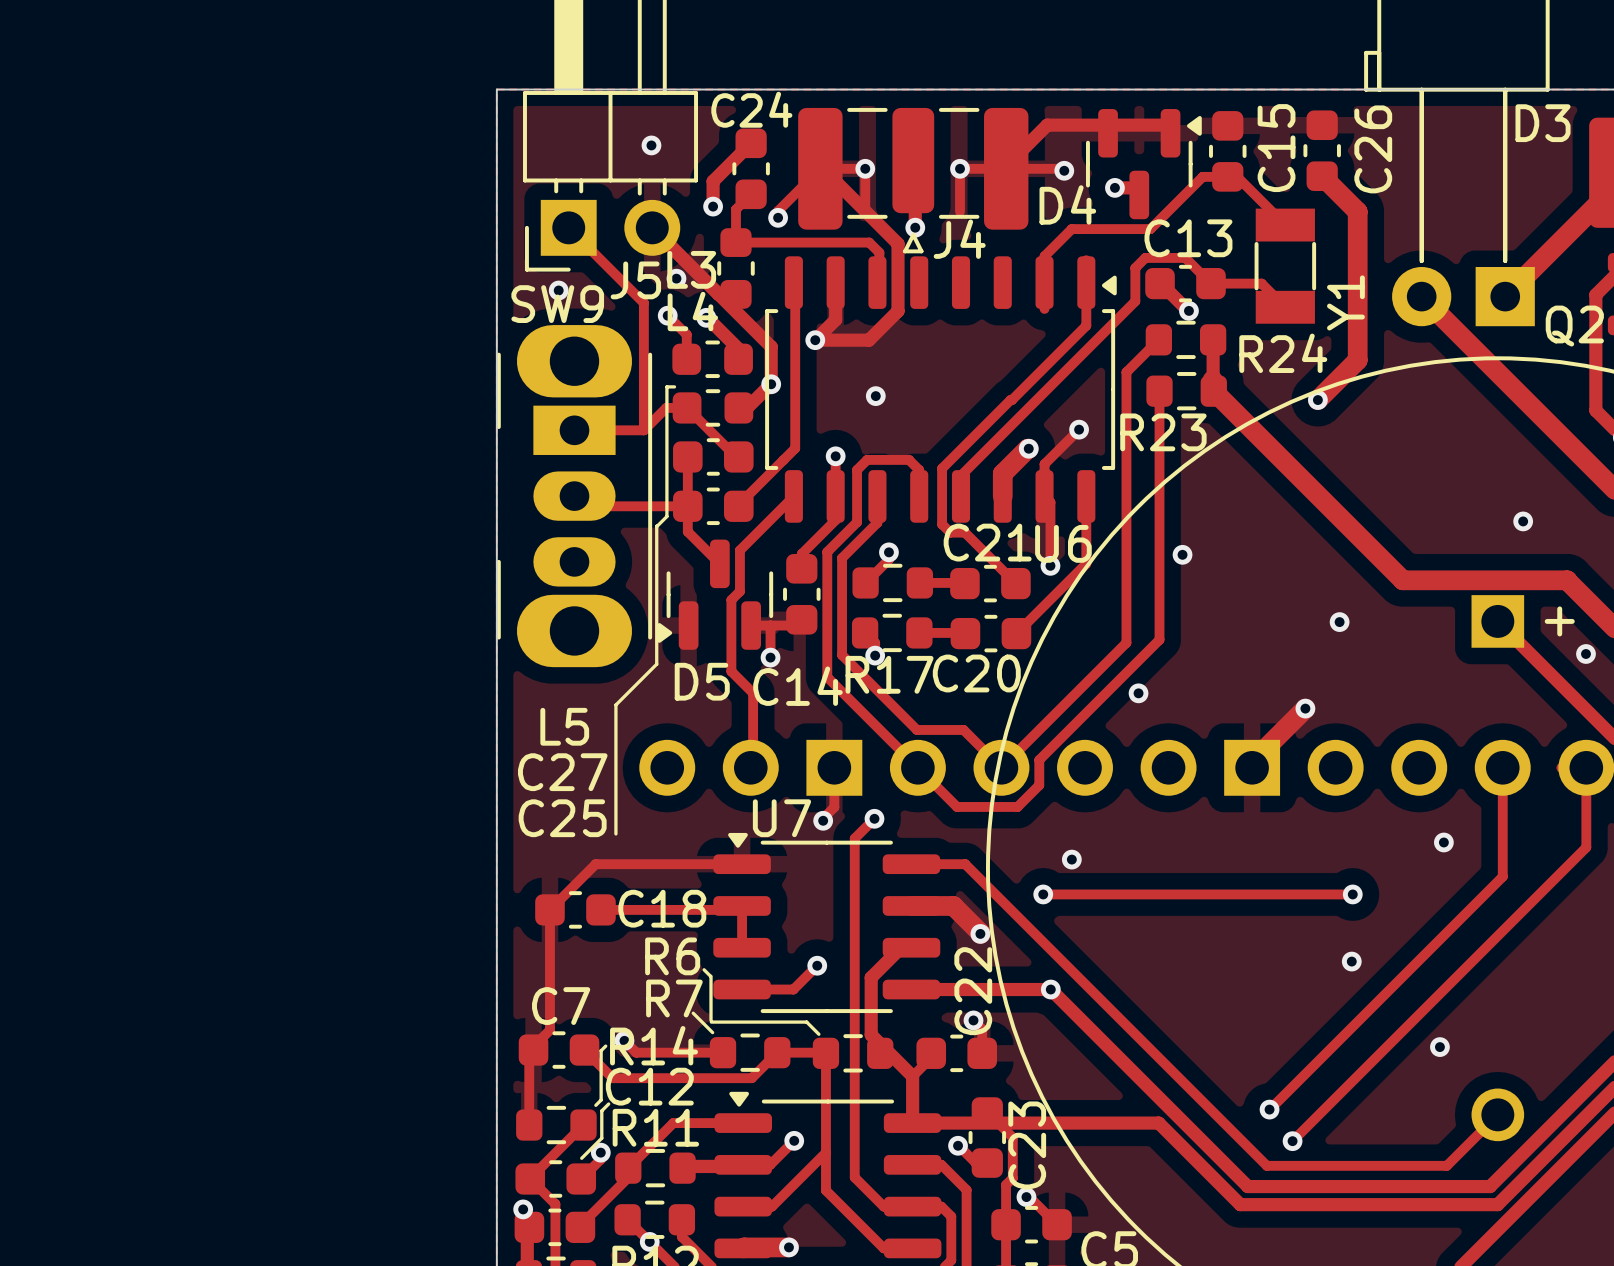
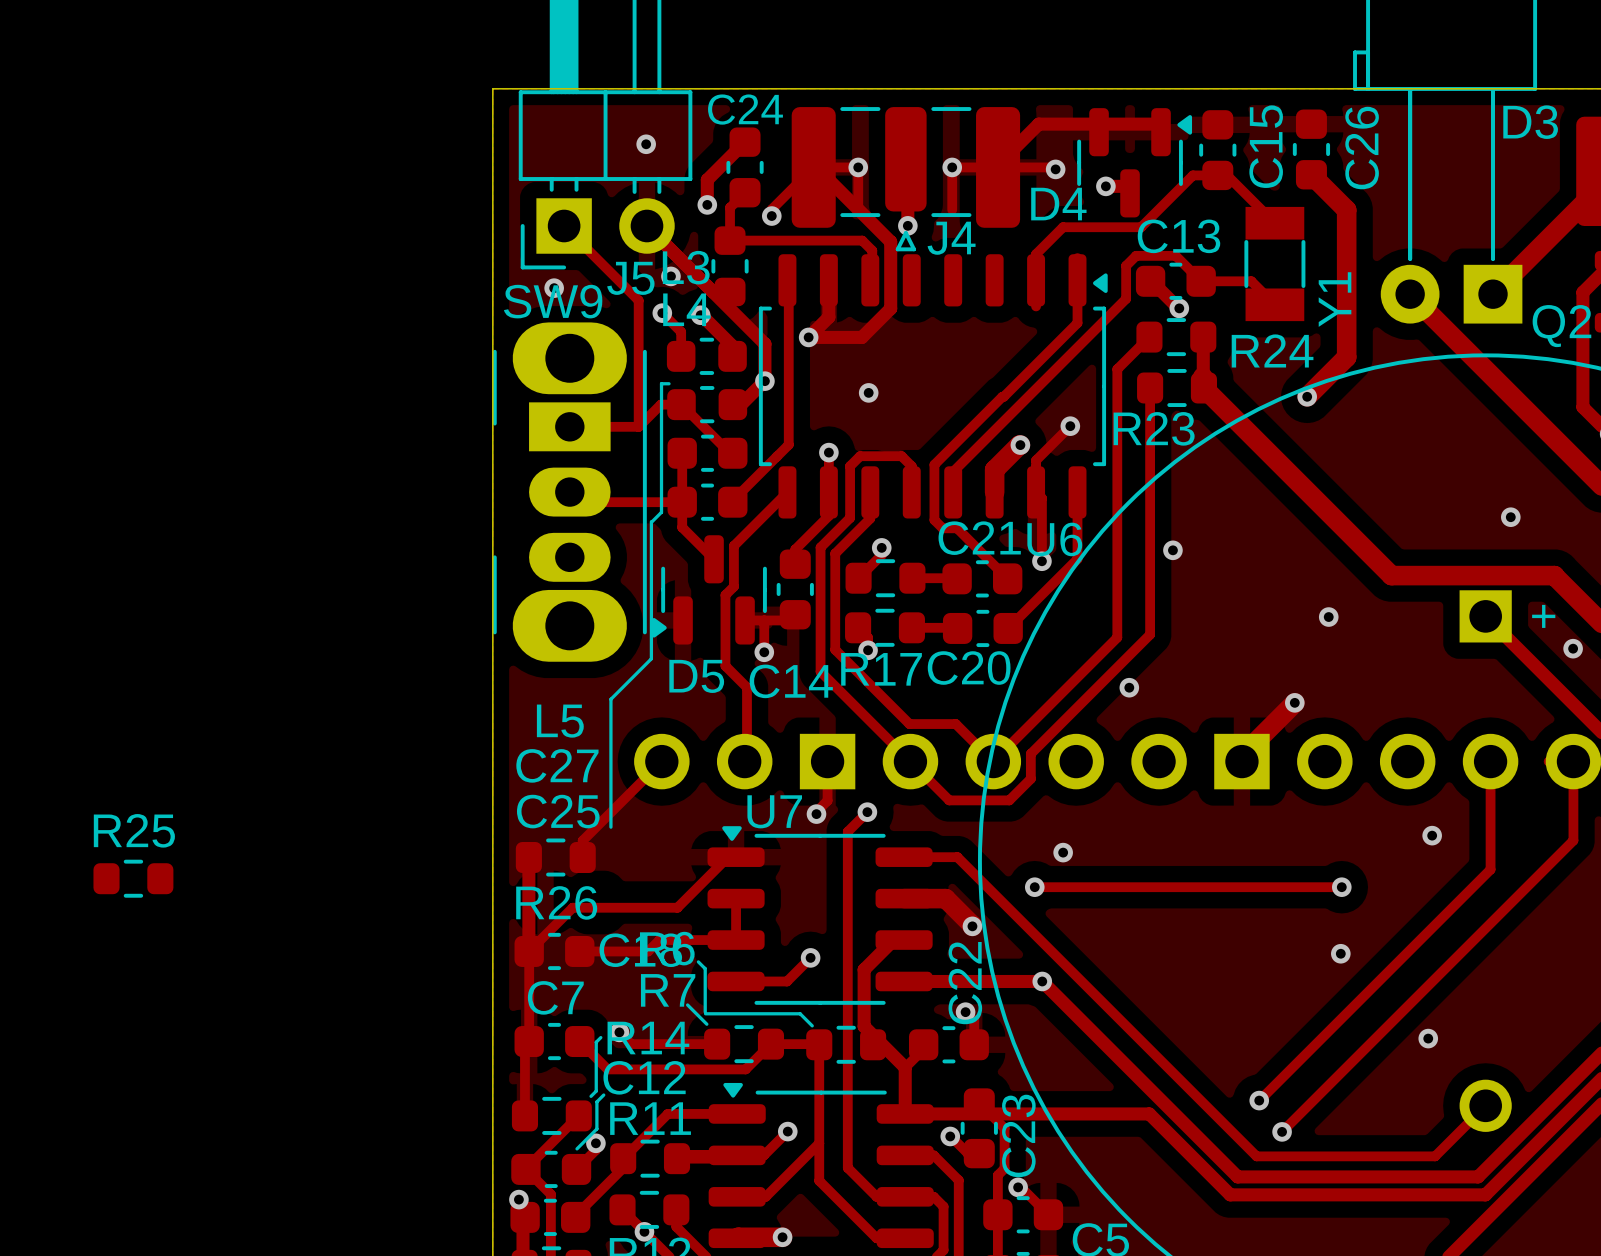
track: none -> (661, 761) (582, 840) (582, 857)
track: none -> (528, 857) (528, 951)
R26: none -> (555, 857)
track: (734, 864) (595, 864) (549, 909) (549, 1030) (533, 1046) -> (728, 857) (677, 907) (572, 907) (529, 951) (529, 1038)
R25: none -> (133, 878)
C18 position: (575, 909) -> (554, 951)
track: (600, 909) (738, 909) -> none
track: none -> (736, 940) (659, 940) (648, 951) (579, 951)

